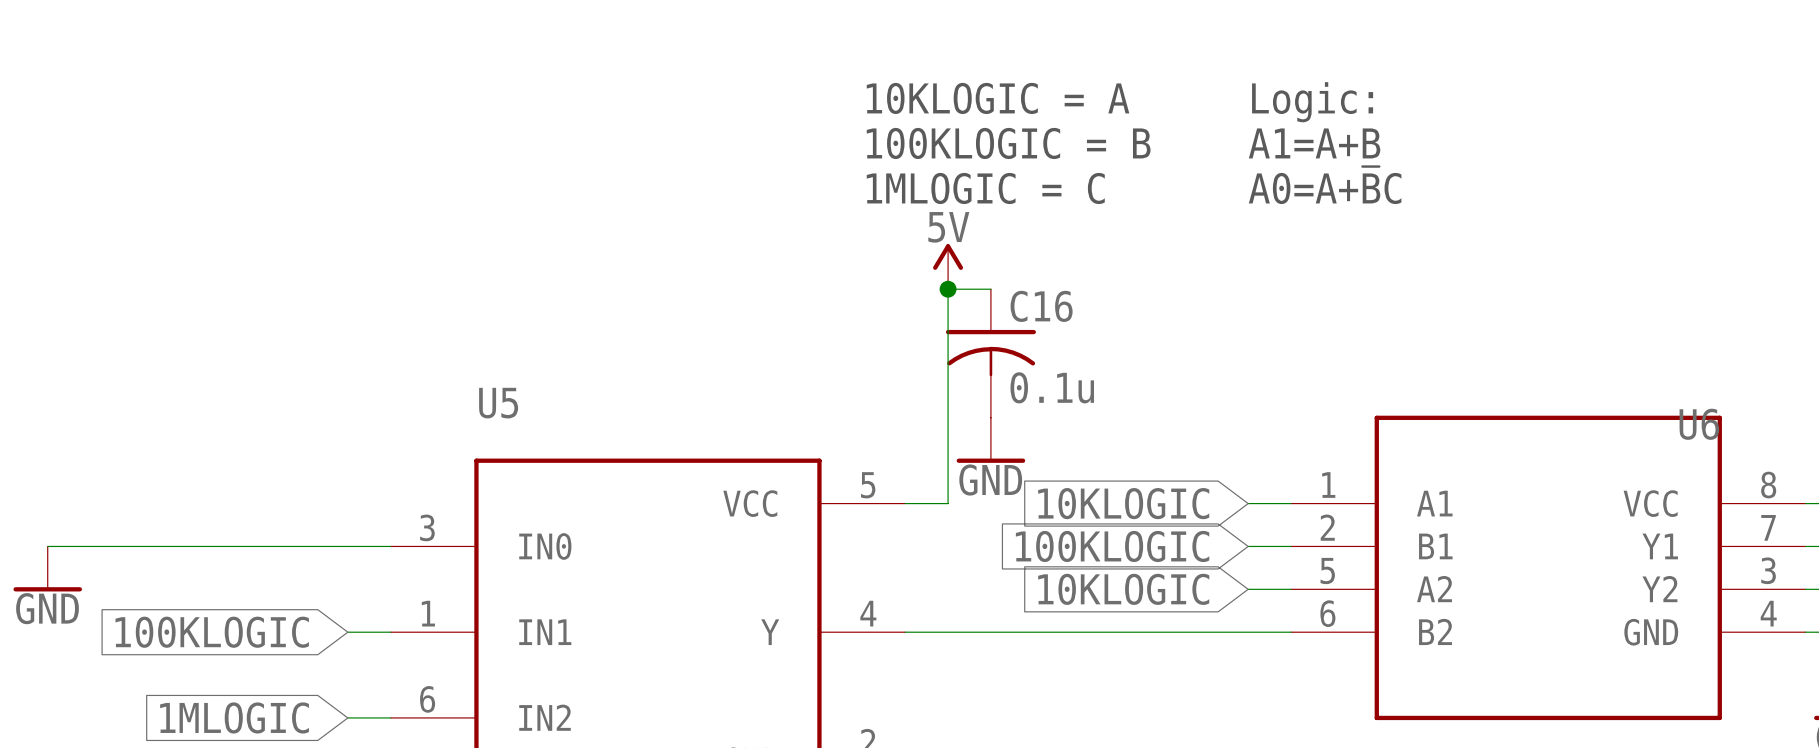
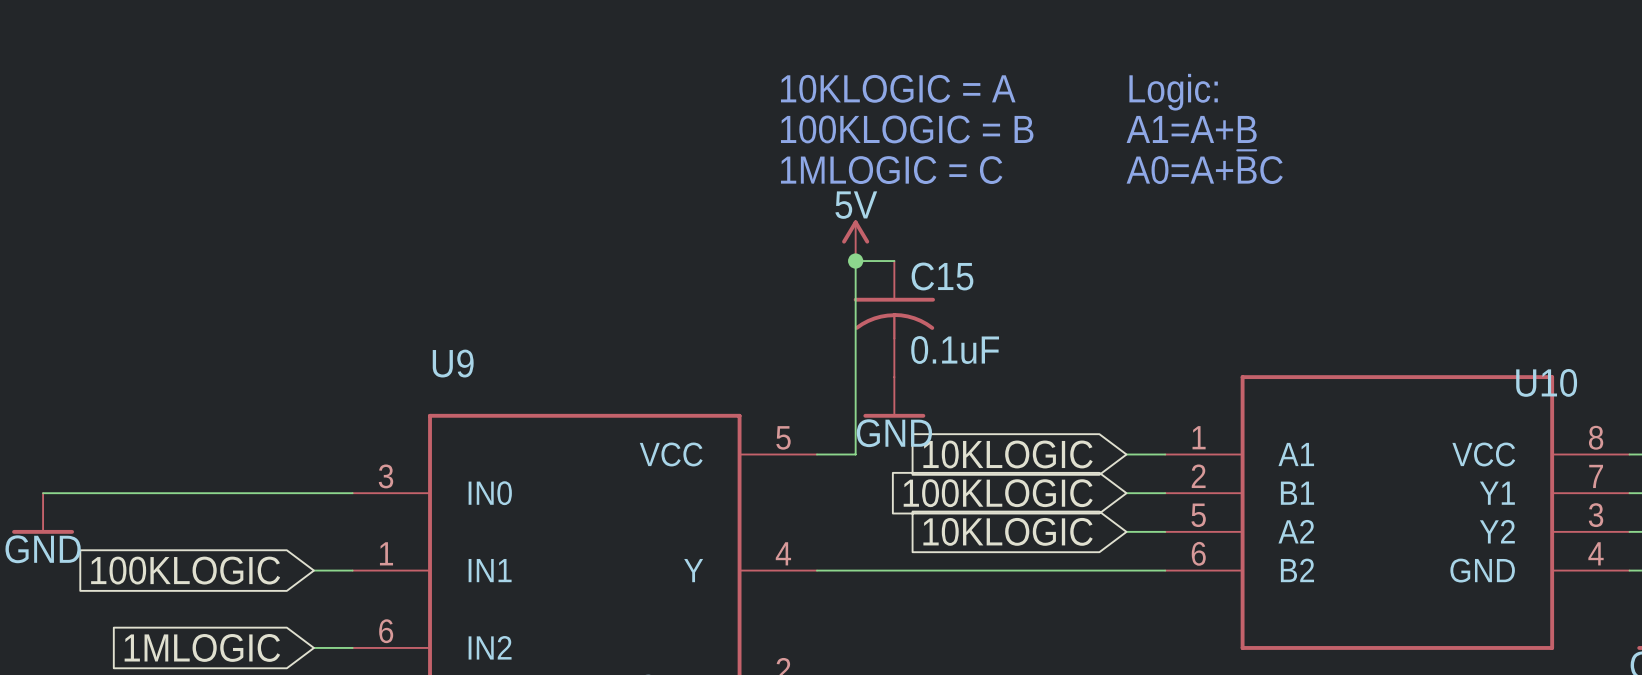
C16 name: C16 (1041, 306) -> C15 (942, 276)
C16 value: 0.1u (1052, 387) -> 0.1uF (955, 350)
U5 name: U5 (498, 403) -> U9 (453, 363)
U6 name: U6 (1699, 424) -> U10 (1546, 382)

